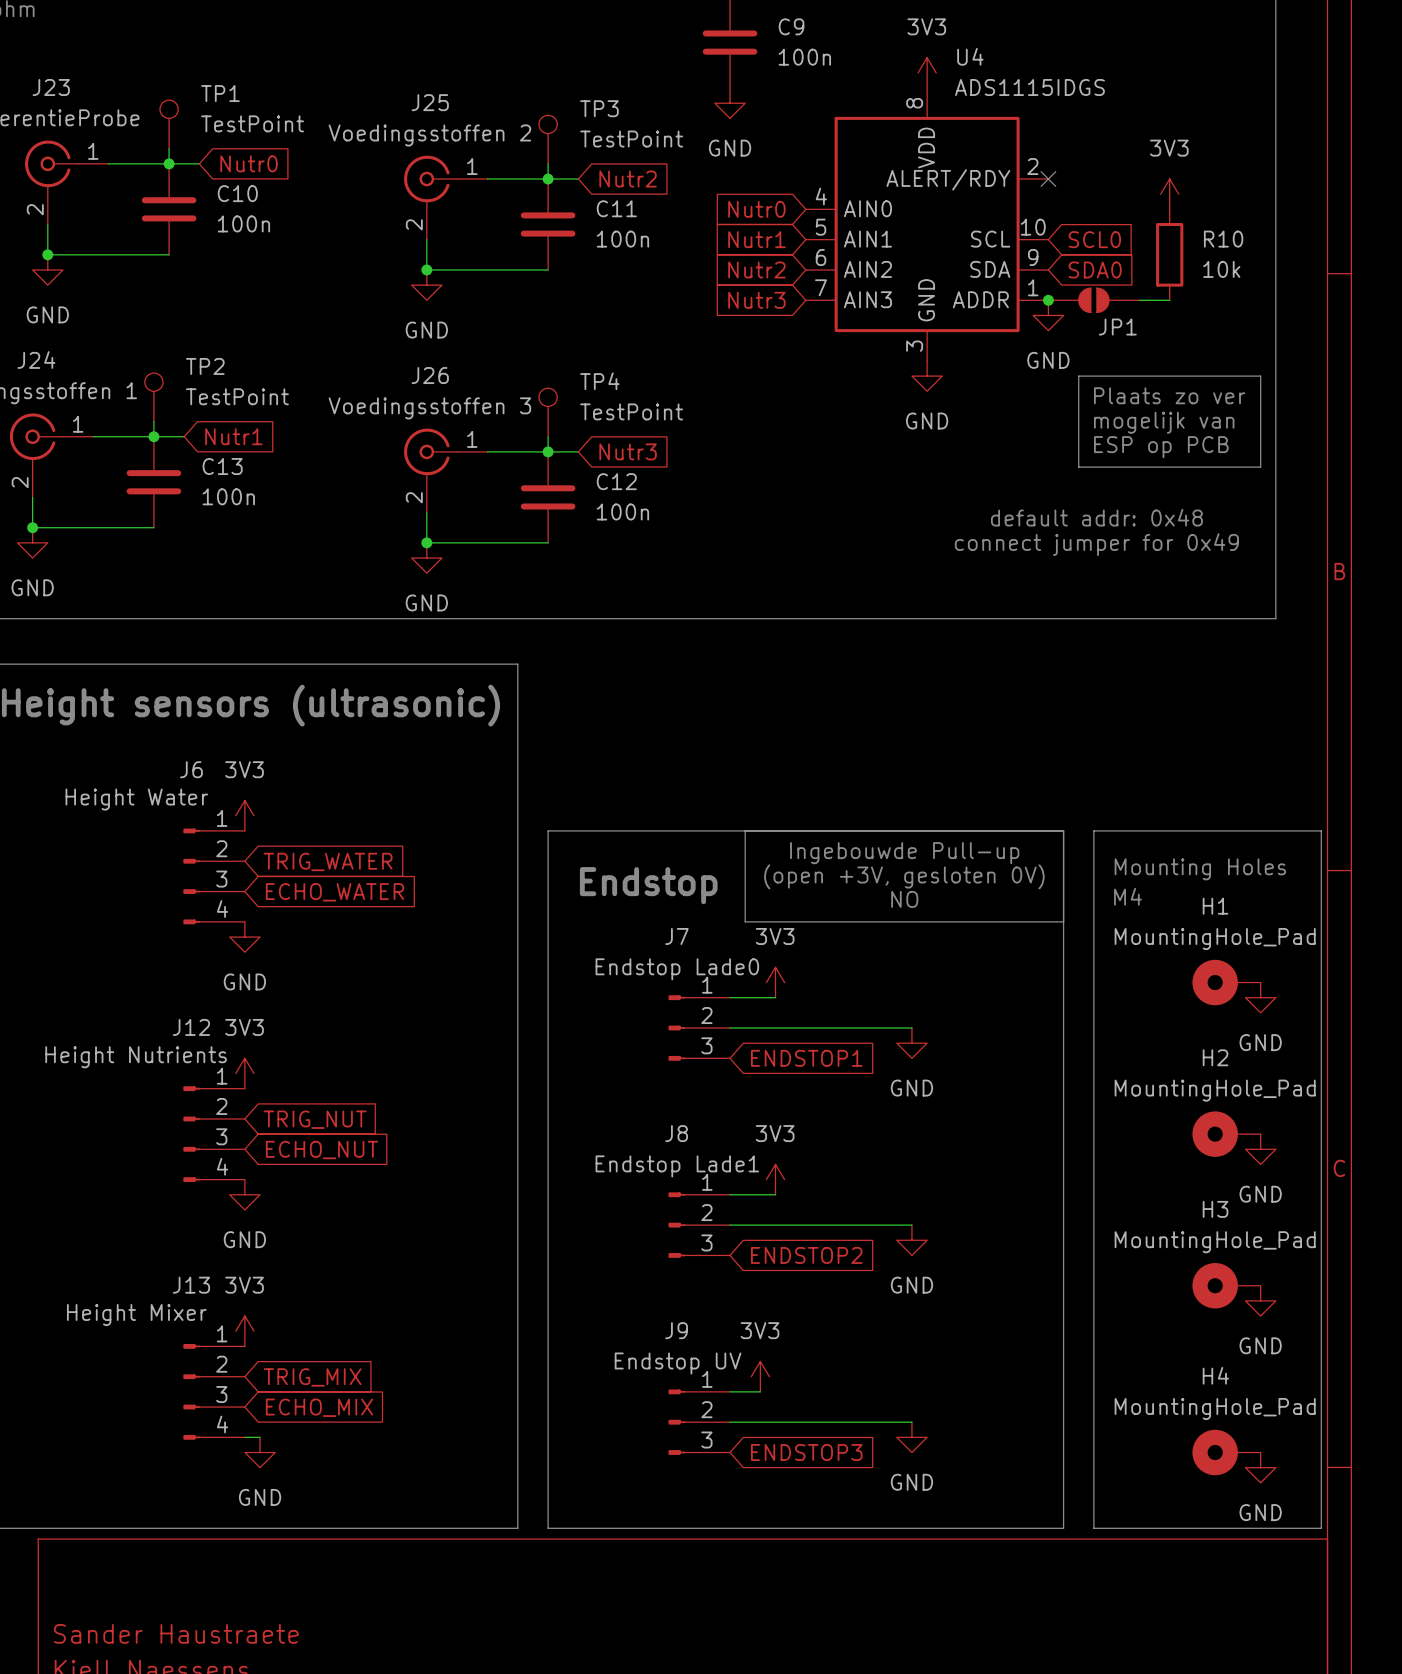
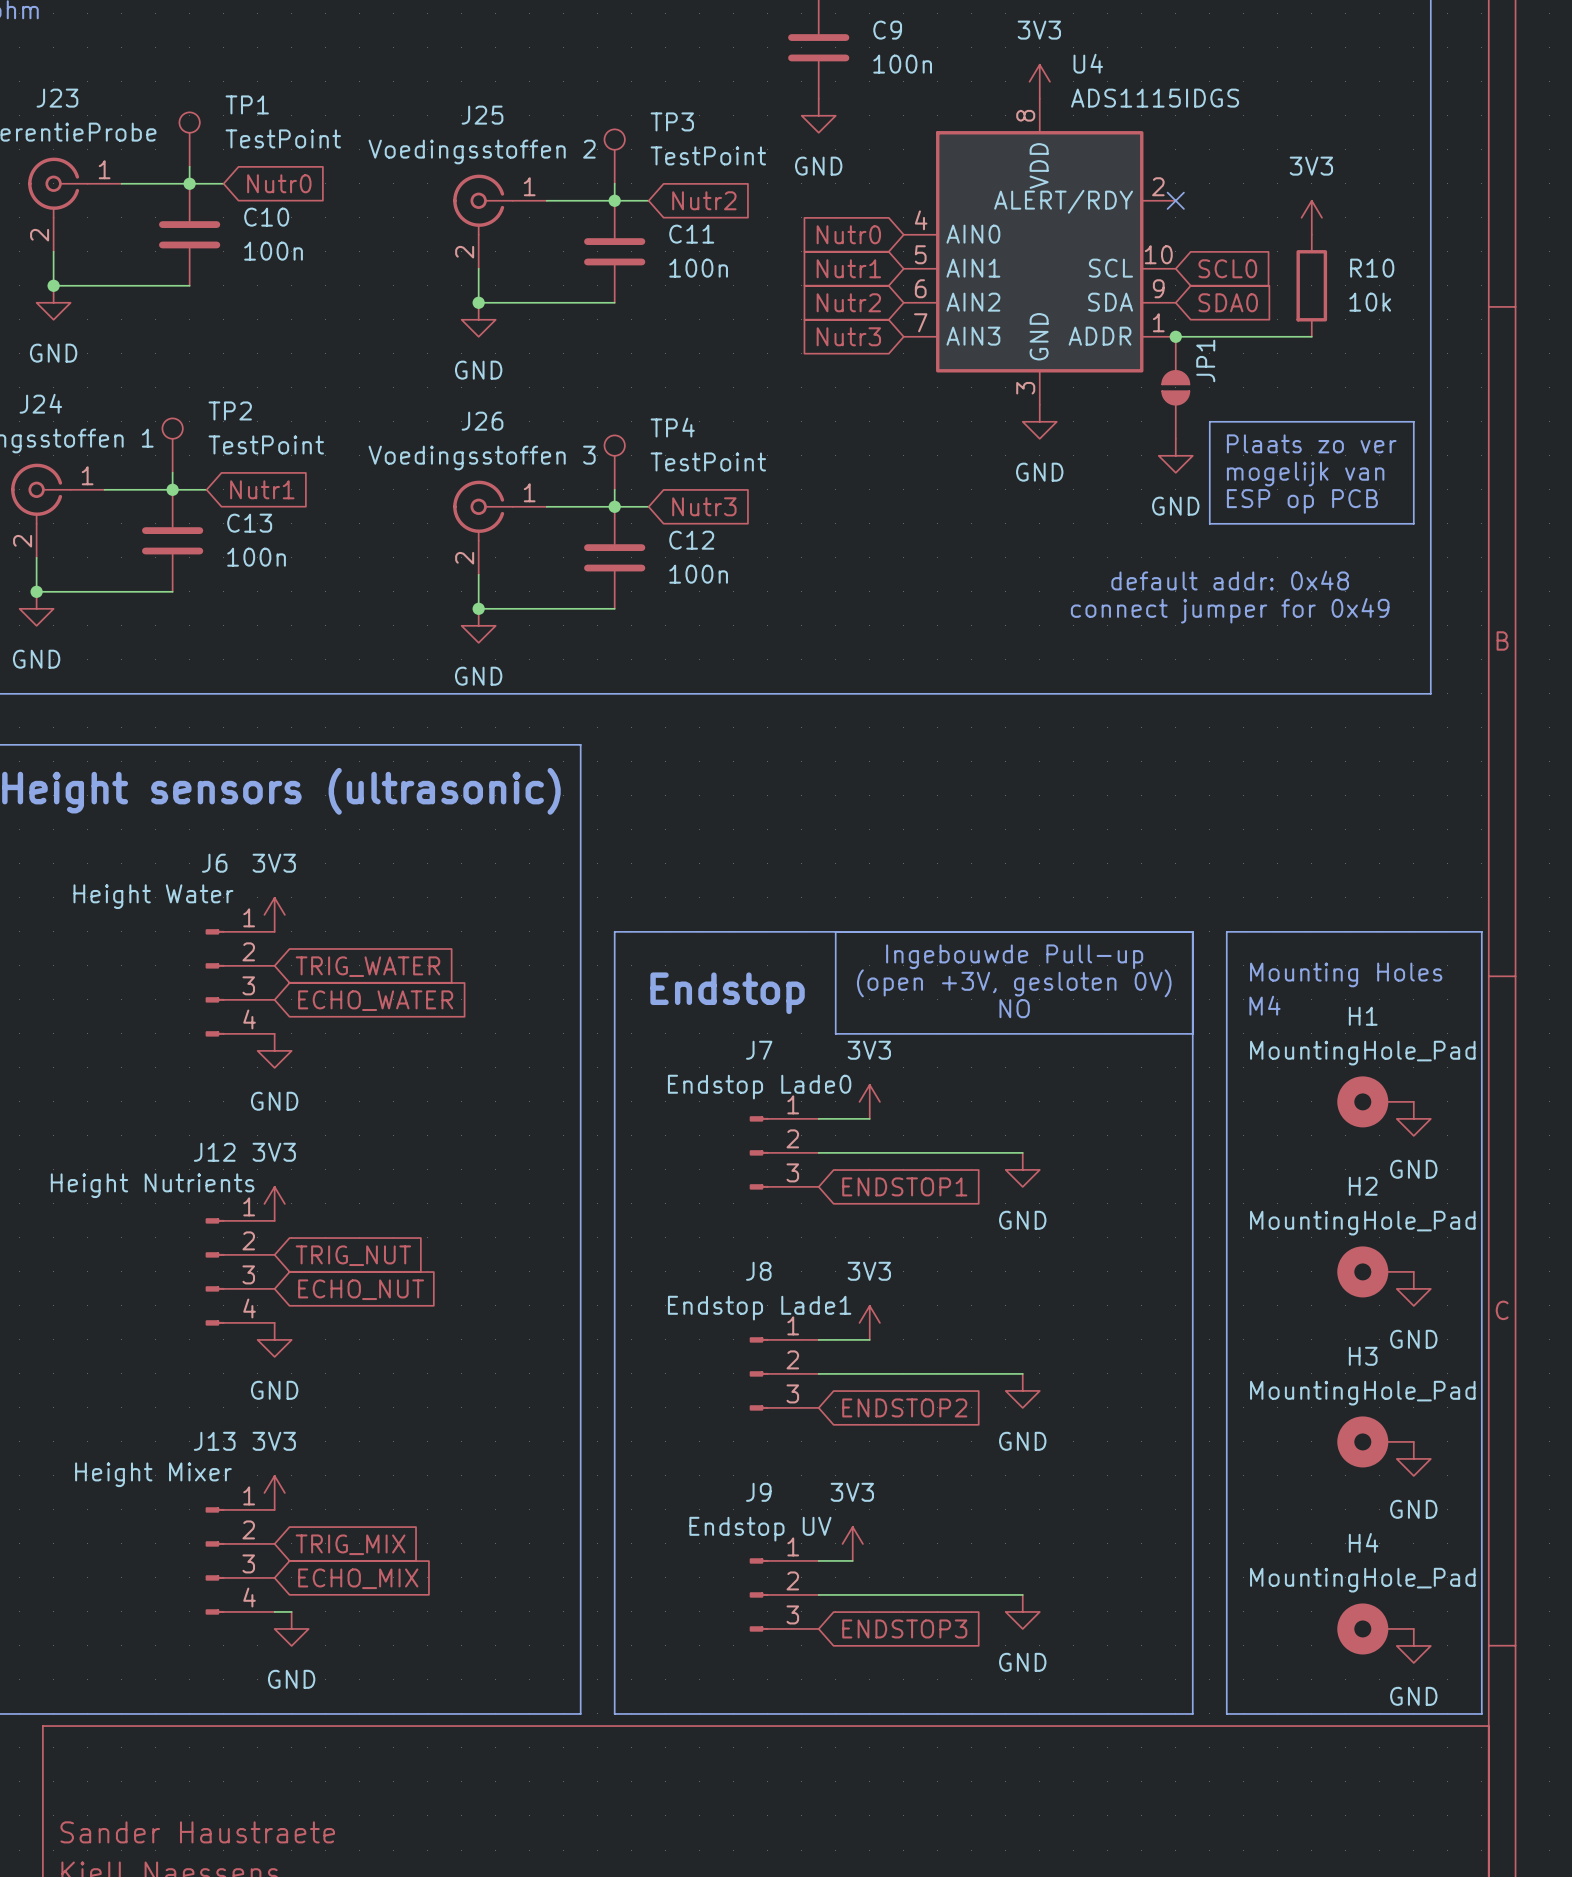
JP1 rotation: 0° (1093, 300) -> 90° clockwise (1175, 387)
JP1 position: (1093, 300) -> (1175, 387)
power symbol position: GND (1048, 315) -> GND (1175, 455)
JP1 name position: JP1 (1117, 327) -> JP1 (1205, 360)

